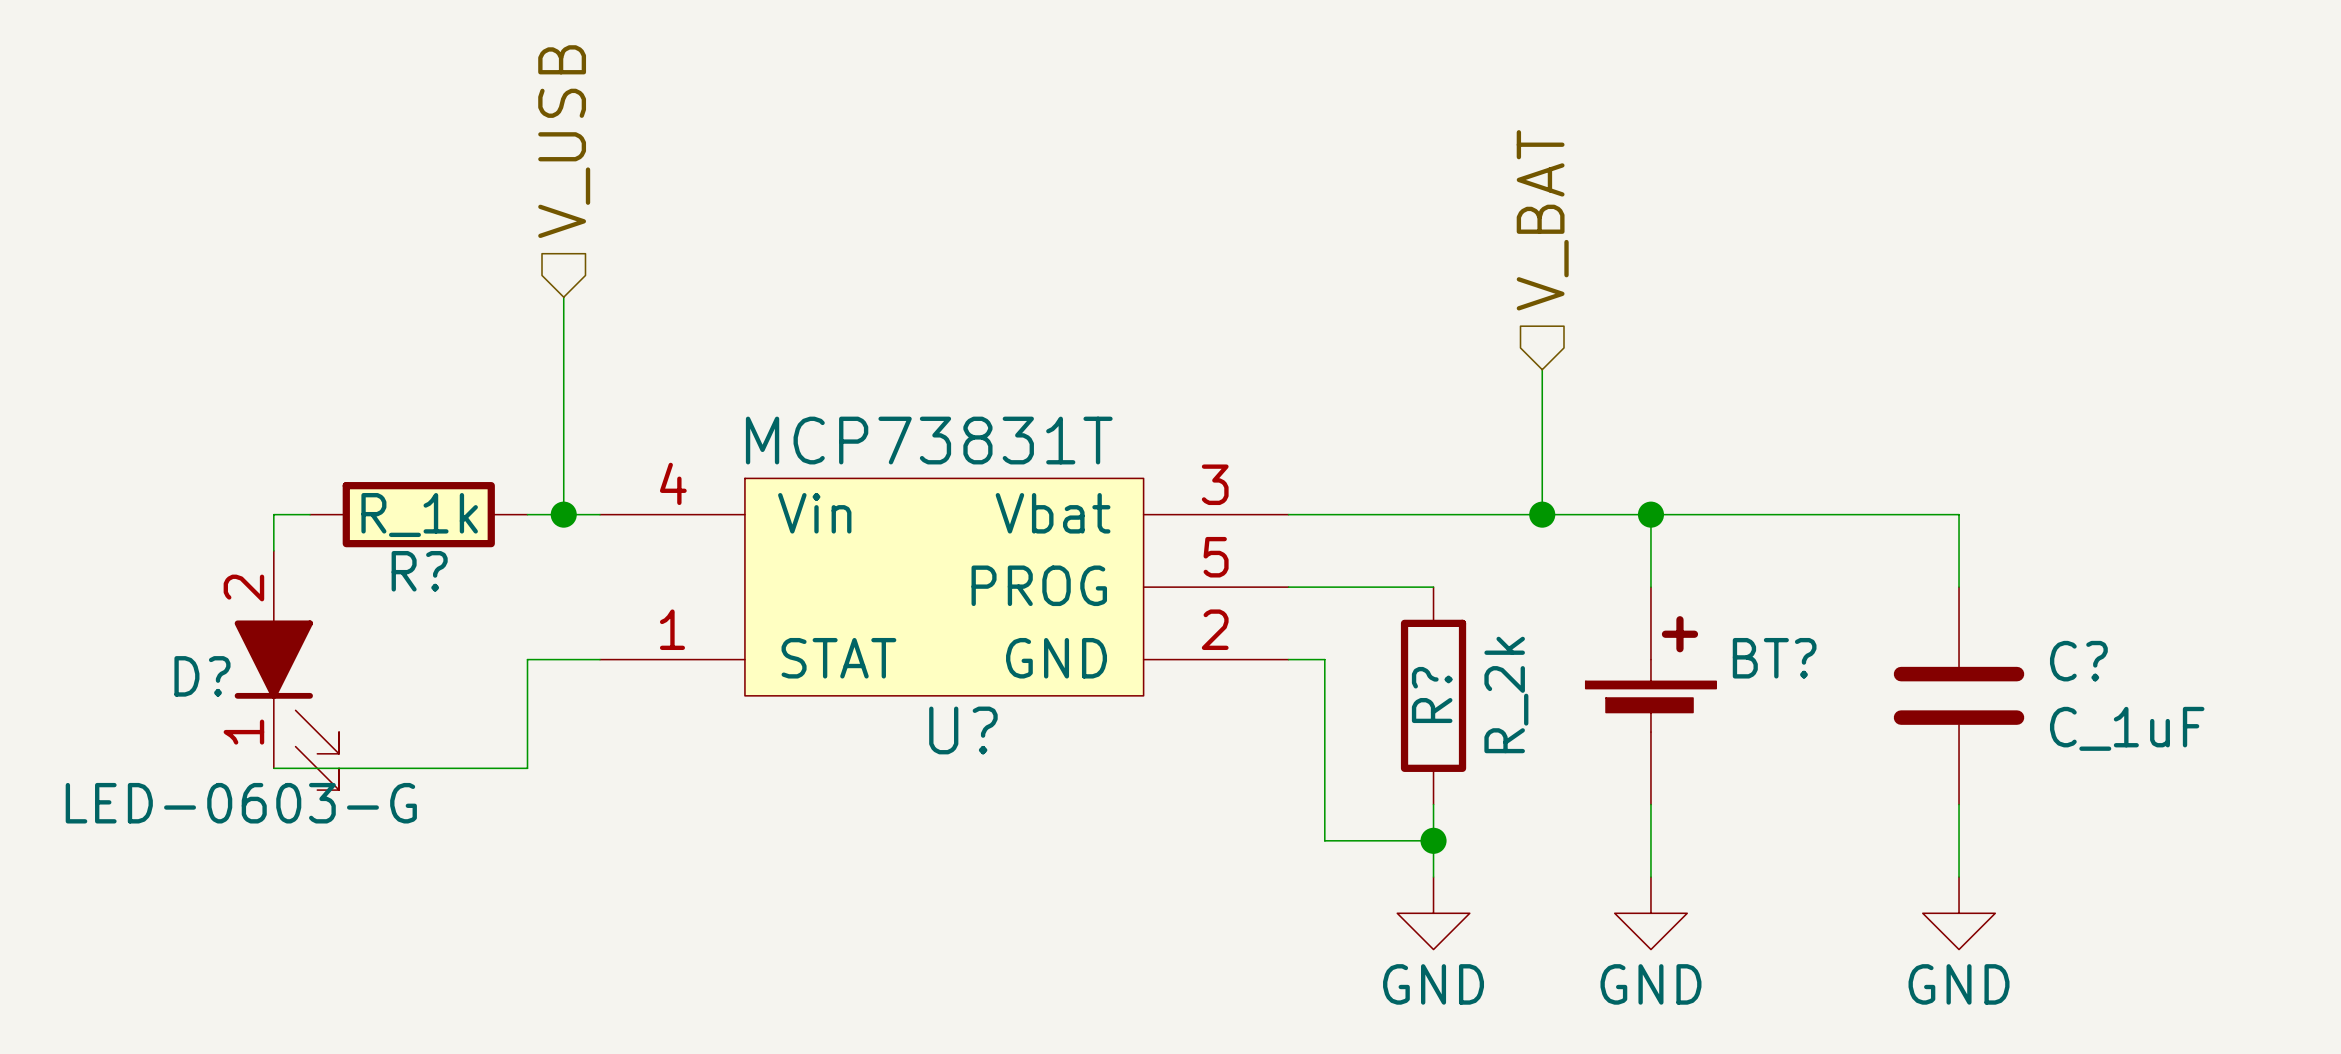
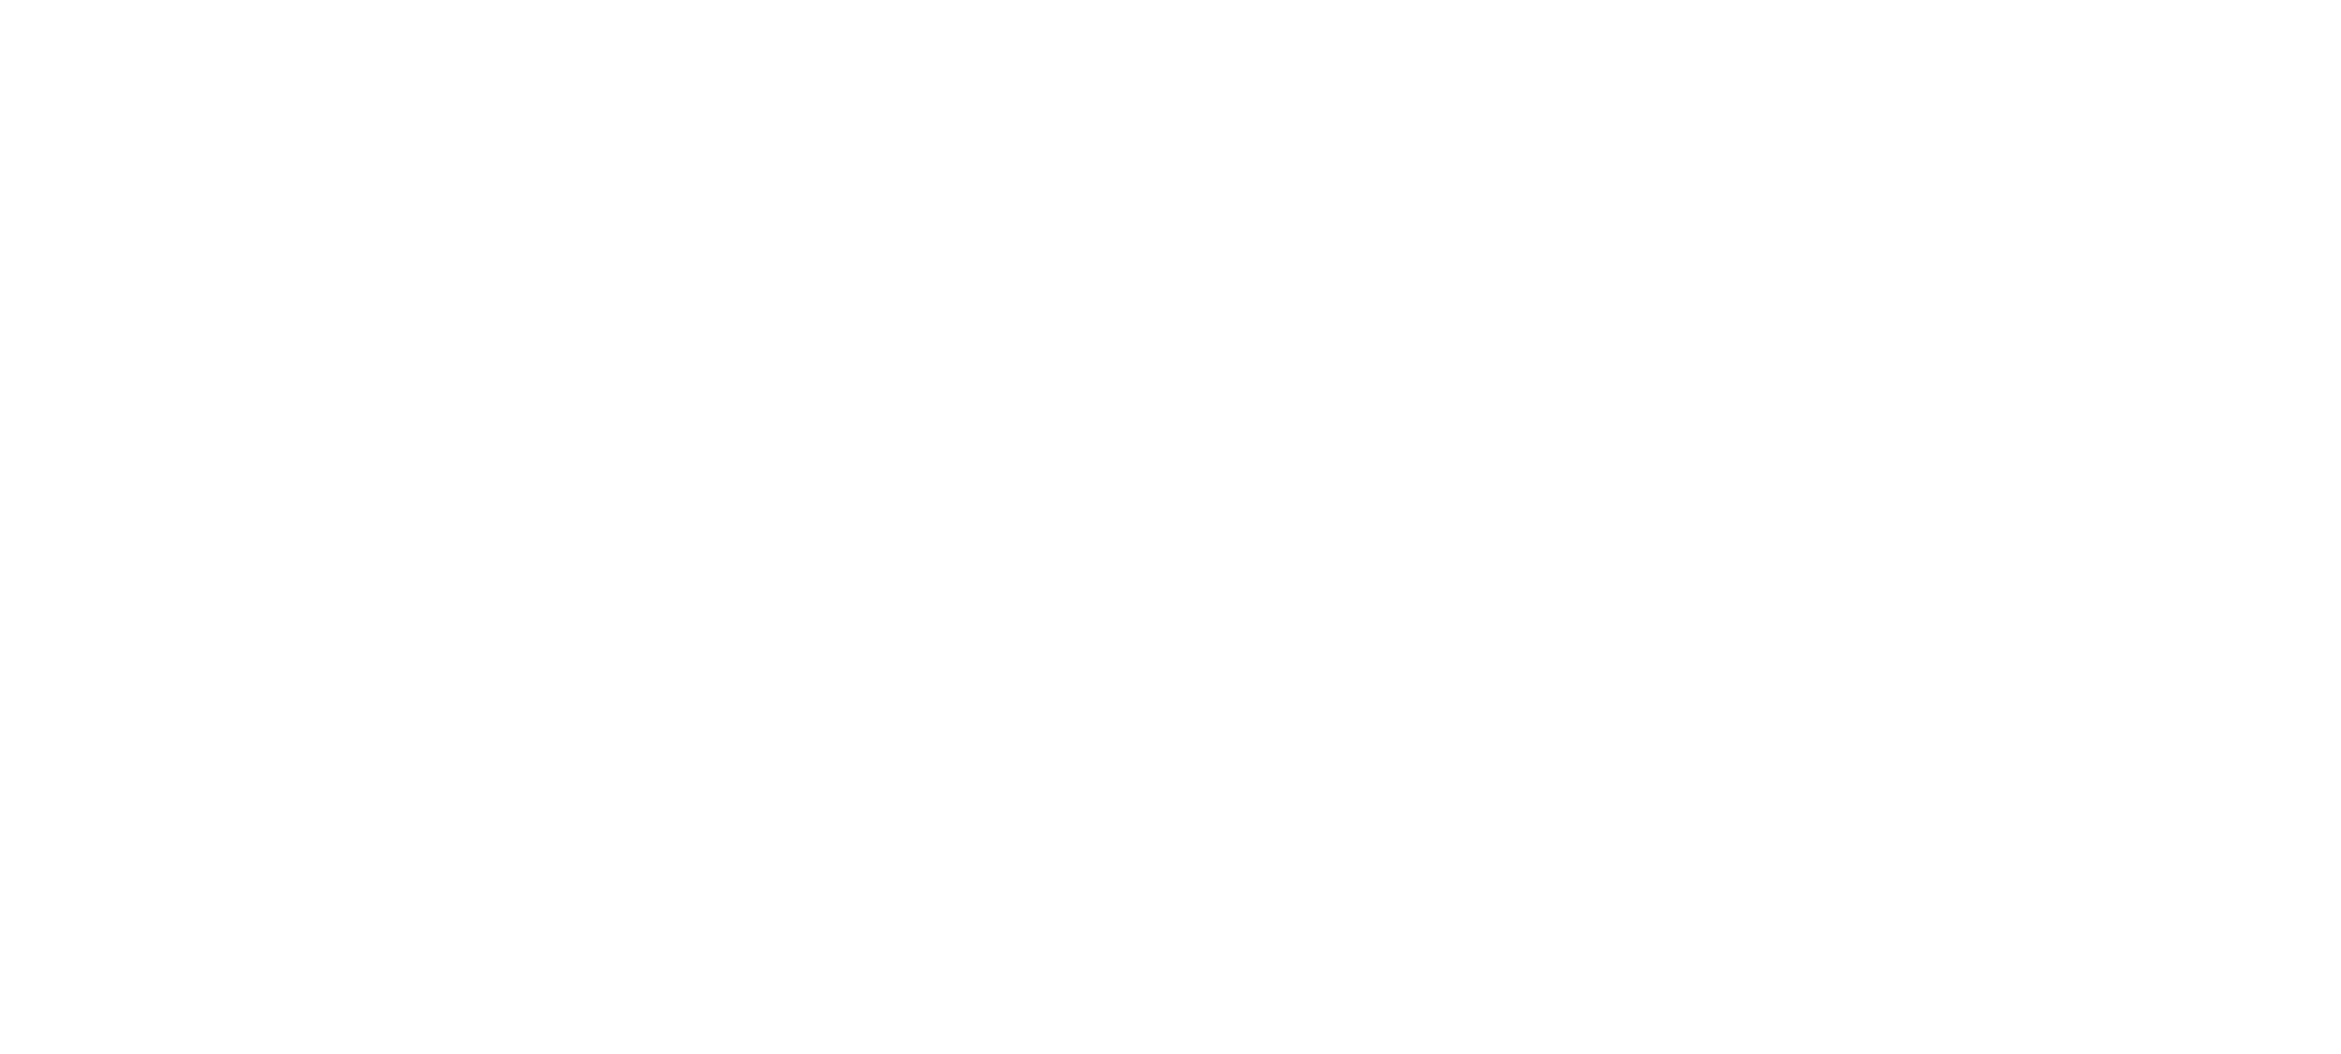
hierarchical label: V_USB (564, 141) -> none
hierarchical label: V_BAT (1542, 220) -> none
wire: (563, 297) (563, 514) -> none
wire: (1542, 369) (1542, 514) -> none
wire: (310, 514) (273, 514) (273, 550) -> none
R?: R_1k (418, 514) -> none
wire: (527, 514) (599, 514) -> none
junction: (563, 514) -> none
wire: (1288, 514) (1959, 514) (1959, 587) -> none
junction: (1542, 514) -> none
wire: (1650, 514) (1650, 587) -> none
junction: (1650, 514) -> none
U?: MCP73831T (944, 587) -> none
wire: (1288, 587) (1433, 587) -> none
wire: (599, 659) (527, 659) (527, 768) (273, 768) -> none
wire: (1288, 659) (1324, 659) (1324, 840) (1433, 840) -> none
D?: LED-0603-G (286, 670) -> none
R?: R_2k (1433, 695) -> none
BT?: (1650, 695) -> none
C?: C_1uF (1959, 695) -> none
wire: (1433, 804) (1433, 877) -> none
wire: (1650, 804) (1650, 877) -> none
wire: (1959, 804) (1959, 877) -> none
junction: (1433, 840) -> none
power symbol: GND (1433, 913) -> none
power symbol: GND (1650, 913) -> none
power symbol: GND (1959, 913) -> none

